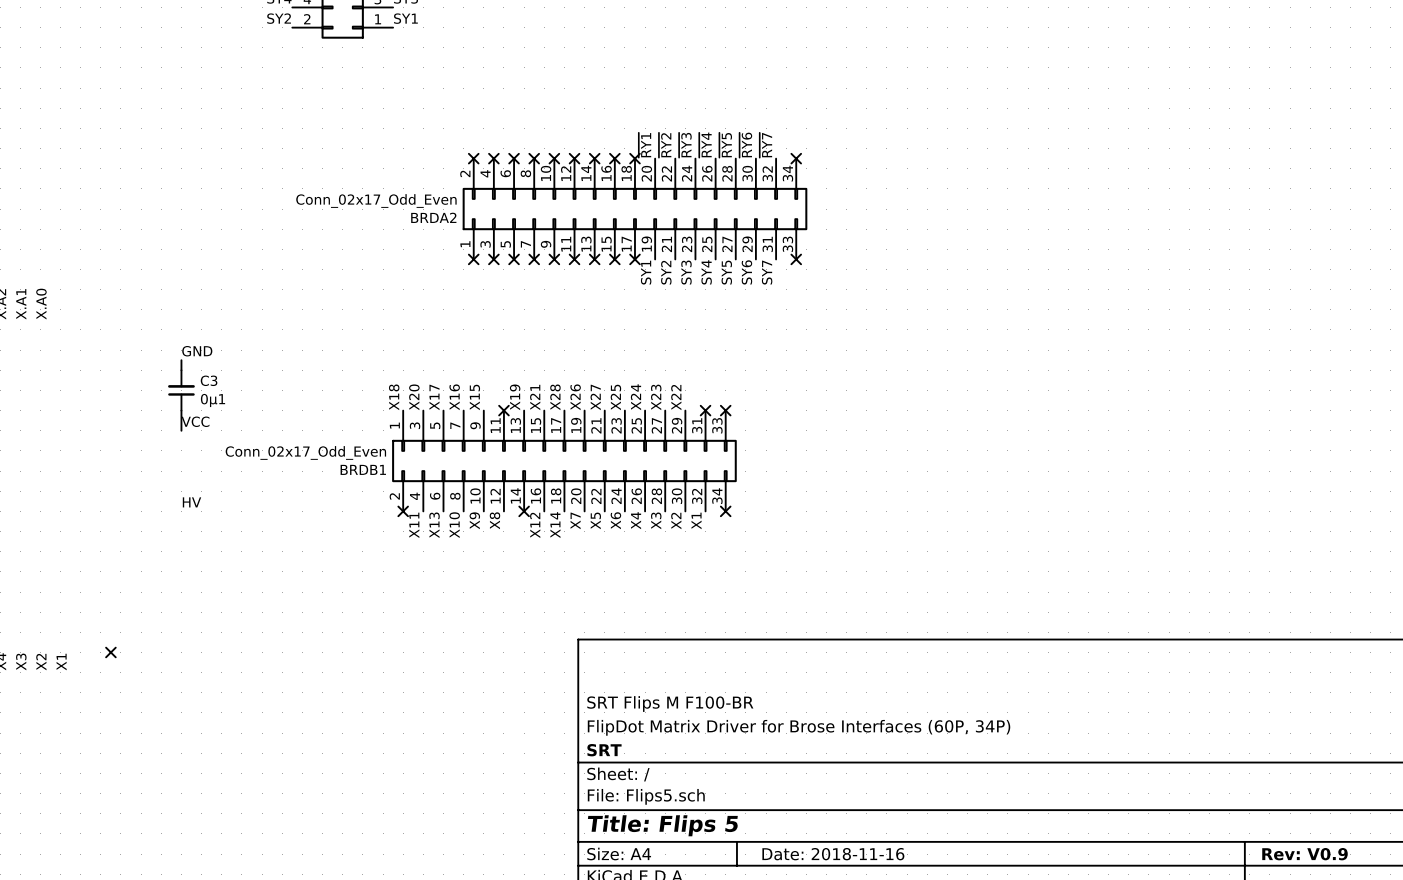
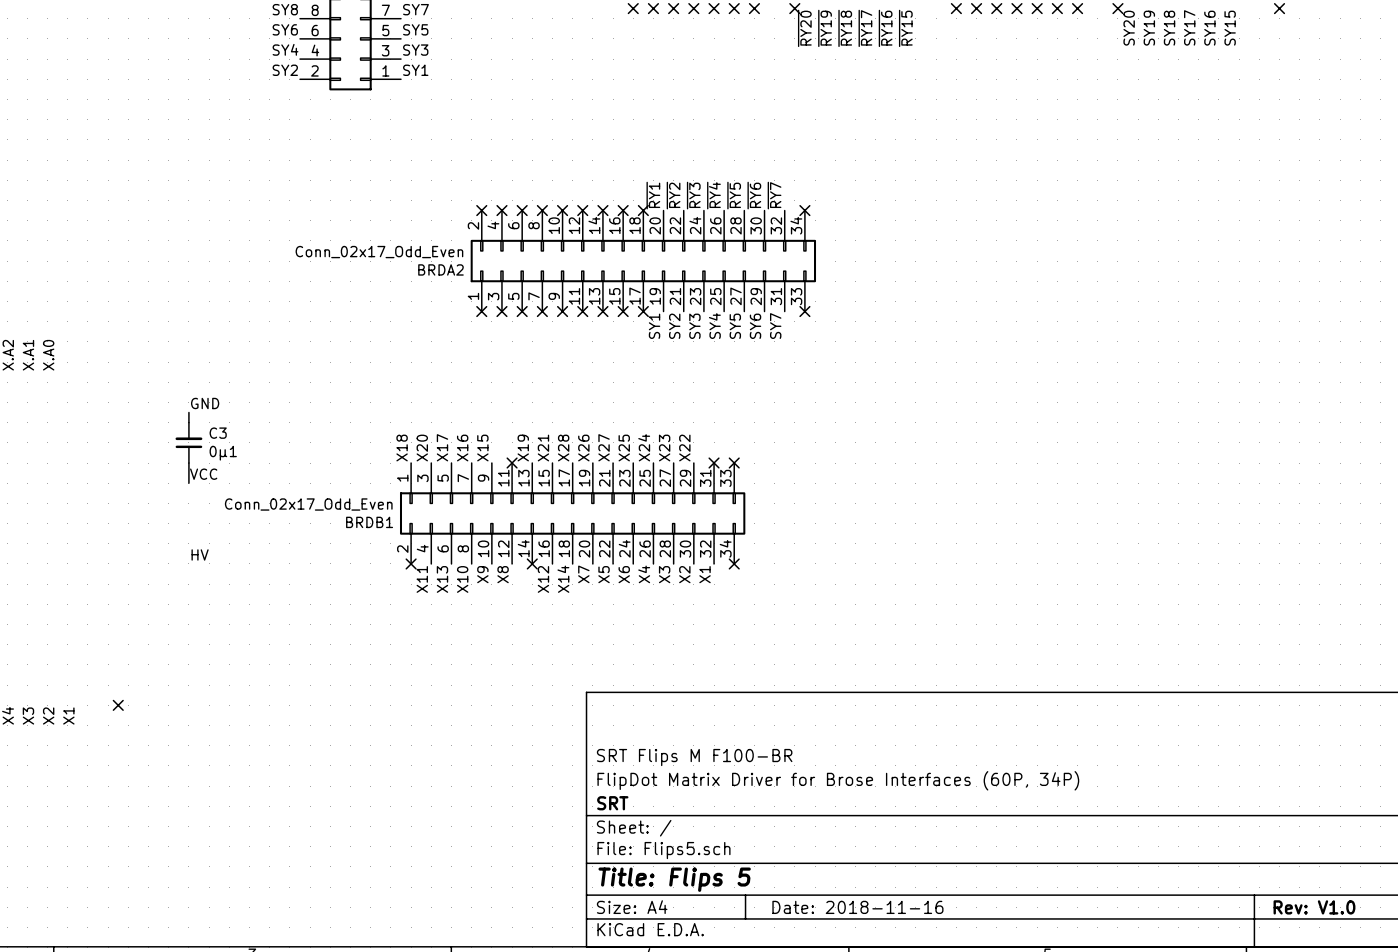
title block: Rev: V0.9 (1305, 854) -> Rev: V1.0 (1314, 907)

